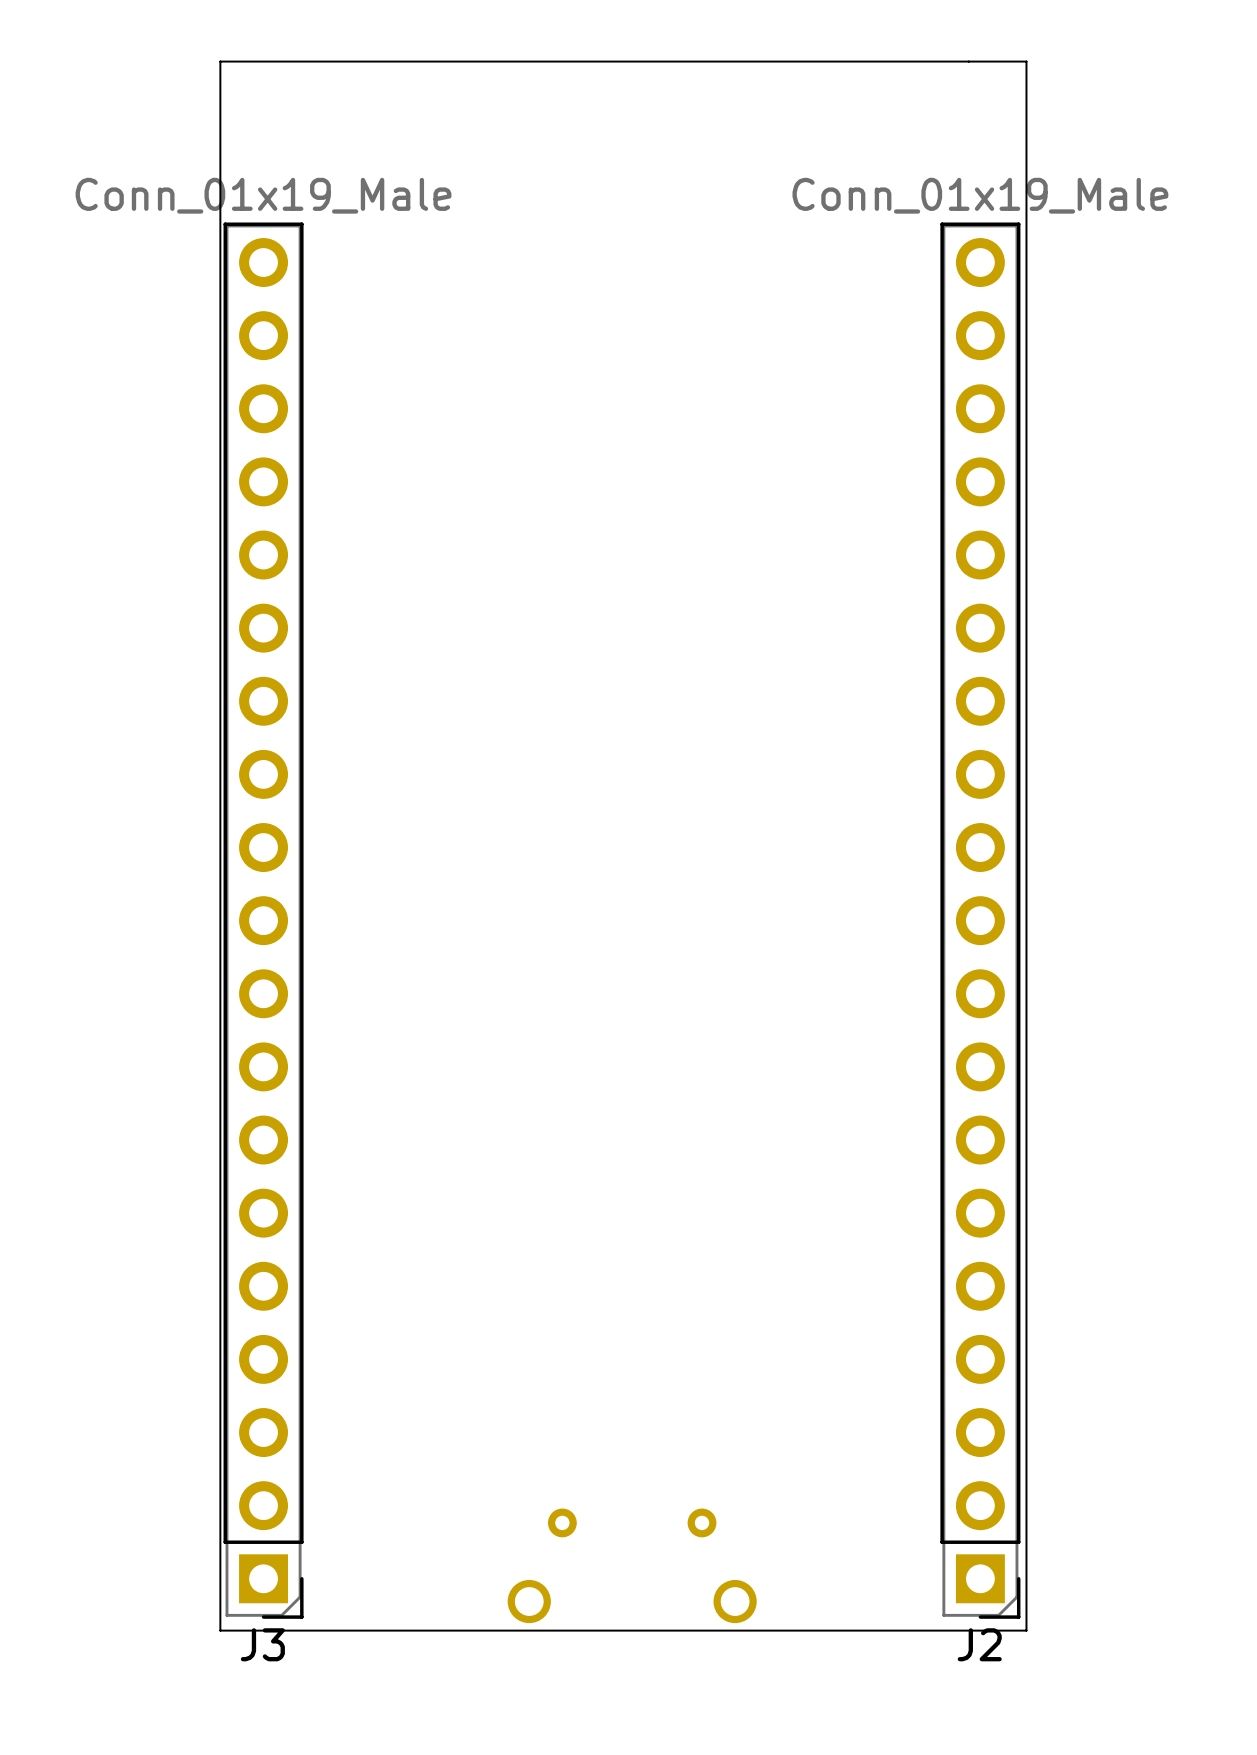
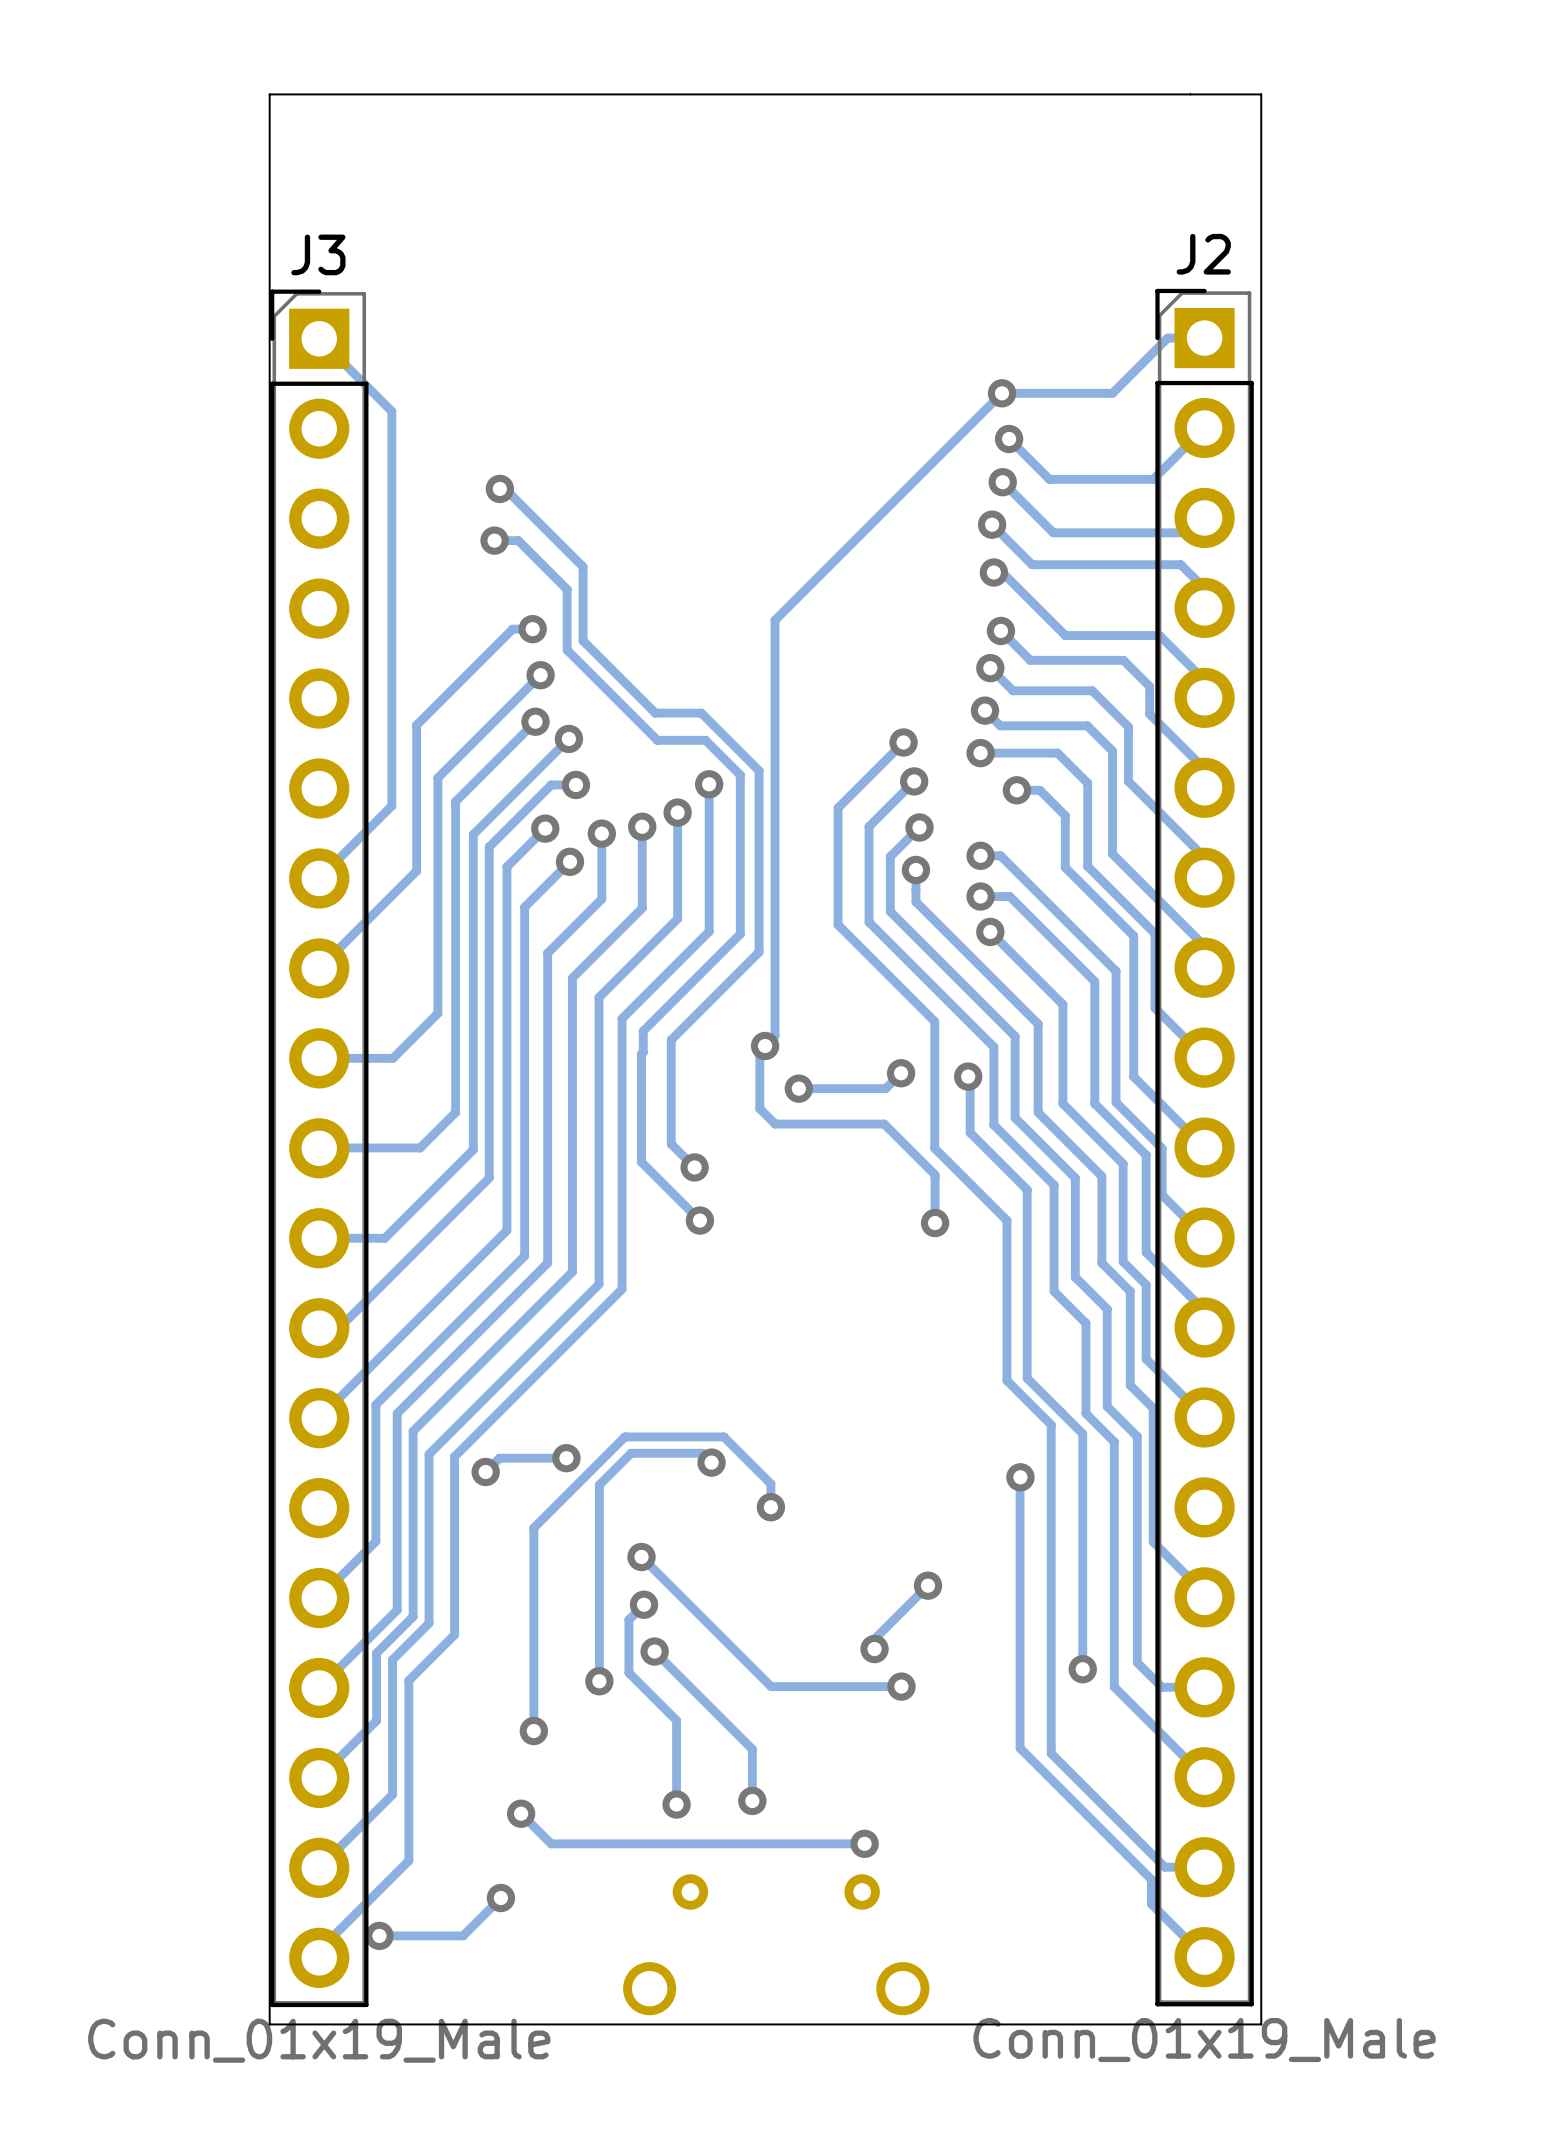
track: none -> (1204, 338) (1167, 338) (1112, 393) (1002, 393) (775, 620) (775, 1036) (759, 1051) (759, 1108) (775, 1124) (884, 1124) (935, 1174) (935, 1223)
track: none -> (319, 338) (391, 411) (391, 805) (319, 878)
via: none -> (1002, 393)
track: none -> (1204, 428) (1153, 479) (1049, 479) (1009, 438)
via: none -> (1009, 438)
track: none -> (1002, 482) (1053, 532) (1189, 532) (1204, 517)
via: none -> (1002, 482)
track: none -> (499, 488) (505, 488) (583, 566) (583, 640) (655, 713) (701, 713) (759, 770) (759, 952) (671, 1039) (671, 1144) (694, 1167)
via: none -> (499, 488)
track: none -> (992, 524) (1032, 564) (1180, 564) (1204, 588) (1204, 607)
via: none -> (992, 524)
track: none -> (494, 540) (518, 540) (567, 589) (567, 650) (657, 740) (705, 740) (740, 775) (740, 934) (643, 1031) (641, 1162) (699, 1220)
via: none -> (494, 540)
track: none -> (993, 572) (1002, 572) (1065, 635) (1159, 635) (1204, 680) (1204, 697)
via: none -> (993, 572)
track: none -> (532, 629) (512, 629) (416, 725) (416, 871) (319, 968)
via: none -> (532, 629)
track: none -> (1000, 630) (1030, 660) (1123, 660) (1149, 686) (1149, 714) (1204, 769) (1204, 787)
via: none -> (1000, 630)
track: none -> (990, 668) (1013, 690) (1092, 690) (1128, 726) (1128, 781) (1204, 857) (1204, 877)
via: none -> (990, 668)
track: none -> (540, 675) (437, 777) (437, 1013) (392, 1058) (319, 1058)
via: none -> (540, 675)
track: none -> (985, 710) (1000, 725) (1087, 725) (1112, 750) (1112, 854) (1204, 946) (1204, 967)
via: none -> (985, 710)
track: none -> (535, 721) (455, 801) (455, 1112) (420, 1147) (319, 1147)
via: none -> (535, 721)
track: none -> (568, 738) (473, 834) (473, 1149) (384, 1238) (319, 1238)
via: none -> (568, 738)
track: none -> (903, 742) (838, 808) (838, 924) (934, 1021) (934, 1148) (1006, 1220) (1006, 1380) (1051, 1424) (1051, 1753) (1164, 1867) (1204, 1867)
via: none -> (903, 742)
track: none -> (980, 753) (1057, 753) (1087, 783) (1087, 866) (1155, 933) (1155, 1008) (1204, 1057)
via: none -> (980, 753)
track: none -> (914, 781) (869, 826) (869, 922) (993, 1047) (993, 1124) (1054, 1185) (1054, 1291) (1085, 1323) (1085, 1413) (1114, 1441) (1114, 1686) (1204, 1777)
via: none -> (914, 781)
track: none -> (576, 784) (551, 784) (489, 846) (489, 1178) (339, 1328) (319, 1328)
via: none -> (576, 784)
track: none -> (709, 784) (709, 931) (622, 1018) (622, 1289) (454, 1456) (454, 1634) (408, 1680) (408, 1860) (319, 1950) (319, 1957)
via: none -> (709, 784)
track: none -> (1016, 790) (1039, 790) (1065, 815) (1065, 867) (1133, 936) (1133, 1076) (1204, 1147)
via: none -> (1016, 790)
track: none -> (677, 812) (677, 918) (599, 997) (599, 1284) (429, 1454) (429, 1623) (392, 1659) (392, 1794) (319, 1867)
via: none -> (677, 812)
track: none -> (642, 826) (642, 908) (572, 977) (572, 1271) (413, 1431) (413, 1616) (376, 1653) (376, 1720) (319, 1777)
via: none -> (642, 826)
track: none -> (919, 827) (890, 856) (890, 911) (1015, 1036) (1015, 1117) (1075, 1178) (1075, 1277) (1107, 1309) (1107, 1406) (1137, 1436) (1137, 1662) (1162, 1687) (1204, 1687)
via: none -> (919, 827)
track: none -> (545, 828) (506, 866) (506, 1230) (319, 1418)
via: none -> (545, 828)
track: none -> (601, 833) (601, 899) (547, 953) (547, 1263) (397, 1413) (397, 1610) (319, 1688)
via: none -> (601, 833)
track: none -> (980, 855) (1000, 855) (1116, 971) (1116, 1102) (1162, 1148) (1162, 1195) (1204, 1237)
via: none -> (980, 855)
track: none -> (569, 861) (524, 907) (524, 1255) (375, 1404) (375, 1541) (319, 1598)
via: none -> (569, 861)
track: none -> (915, 869) (915, 901) (1038, 1024) (1038, 1112) (1101, 1176) (1101, 1263) (1130, 1291) (1130, 1385) (1153, 1408) (1153, 1542) (1204, 1593) (1204, 1597)
via: none -> (915, 869)
track: none -> (980, 896) (1009, 896) (1094, 981) (1094, 1103) (1146, 1155) (1146, 1252) (1204, 1310) (1204, 1327)
via: none -> (980, 896)
track: none -> (990, 931) (1062, 1004) (1062, 1103) (1123, 1163) (1123, 1261) (1146, 1284) (1146, 1359) (1204, 1417)
via: none -> (990, 931)
via: none -> (765, 1045)
track: none -> (901, 1073) (885, 1088) (798, 1088)
via: none -> (901, 1073)
track: none -> (968, 1076) (970, 1078) (970, 1132) (1027, 1189) (1027, 1378) (1082, 1433) (1082, 1669)
via: none -> (968, 1076)
via: none -> (798, 1088)
J3 rotation: 0° (263, 920) -> 180° (319, 1148)
J2 rotation: 0° (980, 920) -> 180° (1204, 1147)
via: none -> (694, 1167)
via: none -> (699, 1220)
via: none -> (935, 1223)
track: none -> (566, 1458) (499, 1458) (485, 1471)
via: none -> (566, 1458)
track: none -> (711, 1462) (702, 1453) (631, 1453) (599, 1484) (599, 1681)
via: none -> (711, 1462)
via: none -> (485, 1471)
via: none -> (1020, 1477)
track: none -> (1020, 1477) (1020, 1748) (1151, 1879) (1151, 1904) (1204, 1957)
track: none -> (770, 1507) (770, 1483) (723, 1436) (624, 1436) (533, 1527) (533, 1731)
via: none -> (770, 1507)
track: none -> (641, 1556) (771, 1686) (901, 1686)
via: none -> (641, 1556)
track: none -> (928, 1585) (874, 1639) (874, 1649)
via: none -> (928, 1585)
track: none -> (644, 1604) (628, 1619) (628, 1672) (676, 1720) (676, 1804)
via: none -> (644, 1604)
via: none -> (874, 1649)
track: none -> (654, 1651) (752, 1749) (752, 1800)
via: none -> (654, 1651)
via: none -> (1082, 1669)
via: none -> (599, 1681)
via: none -> (901, 1686)
via: none -> (533, 1731)
via: none -> (752, 1800)
via: none -> (676, 1804)
track: none -> (521, 1813) (551, 1843) (864, 1843)
via: none -> (521, 1813)
via: none -> (864, 1843)
track: none -> (500, 1898) (463, 1935) (379, 1935)
via: none -> (500, 1898)
via: none -> (379, 1935)

